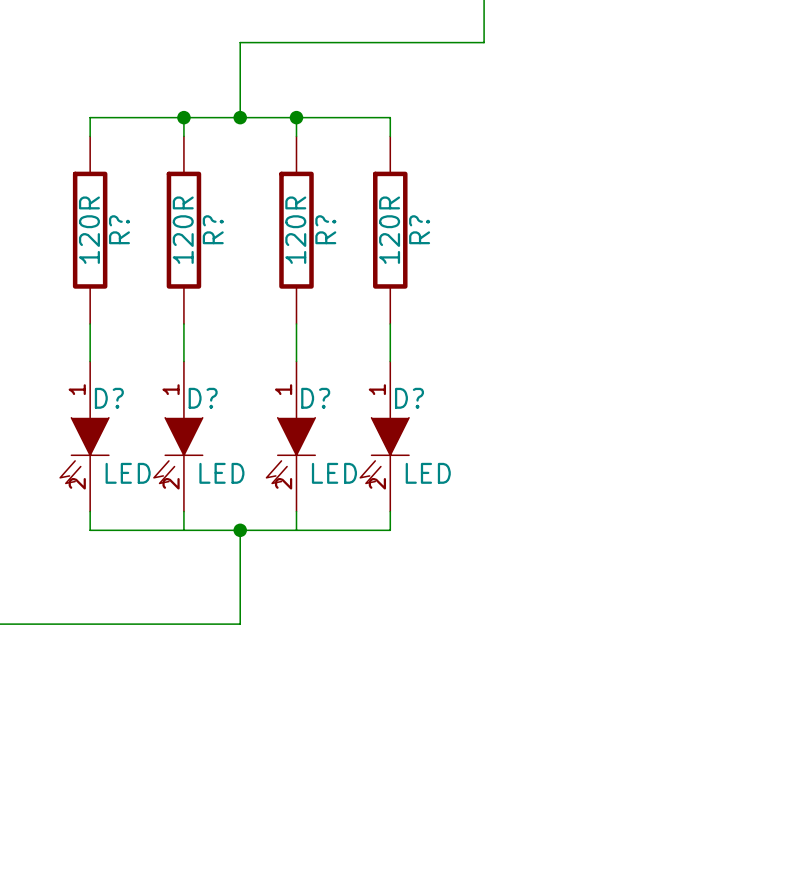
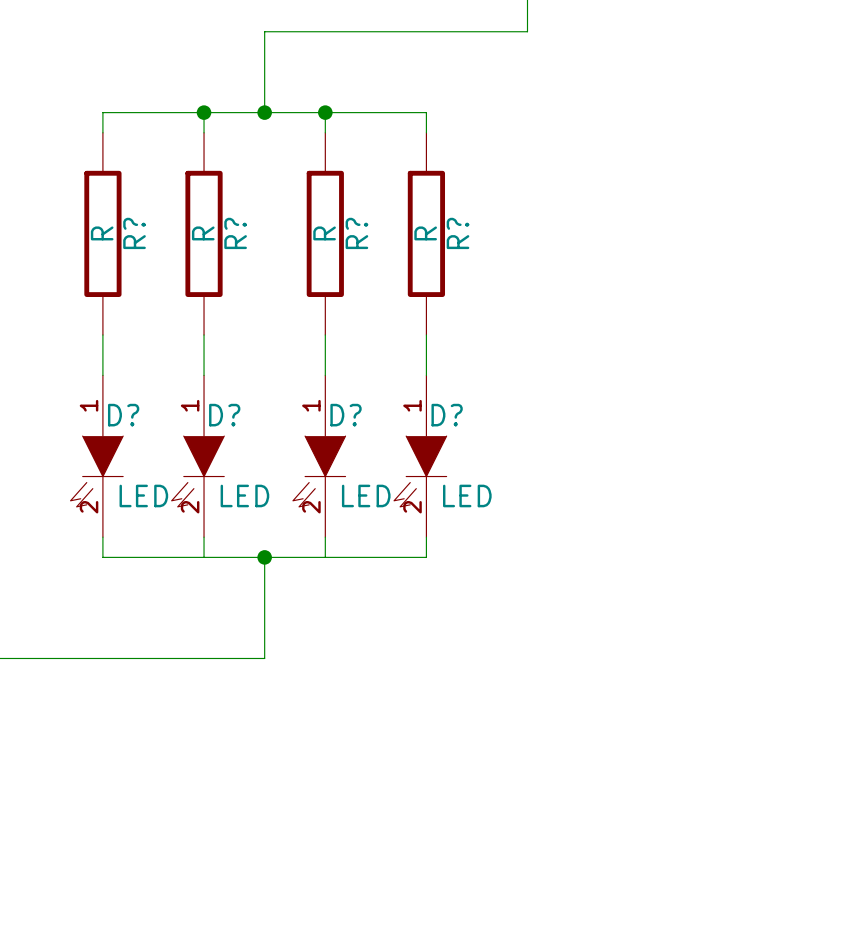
R? value: 120R (89, 230) -> R (102, 233)
R? value: 120R (183, 230) -> R (203, 233)
R? value: 120R (295, 230) -> R (324, 233)
R? value: 120R (389, 230) -> R (425, 233)

